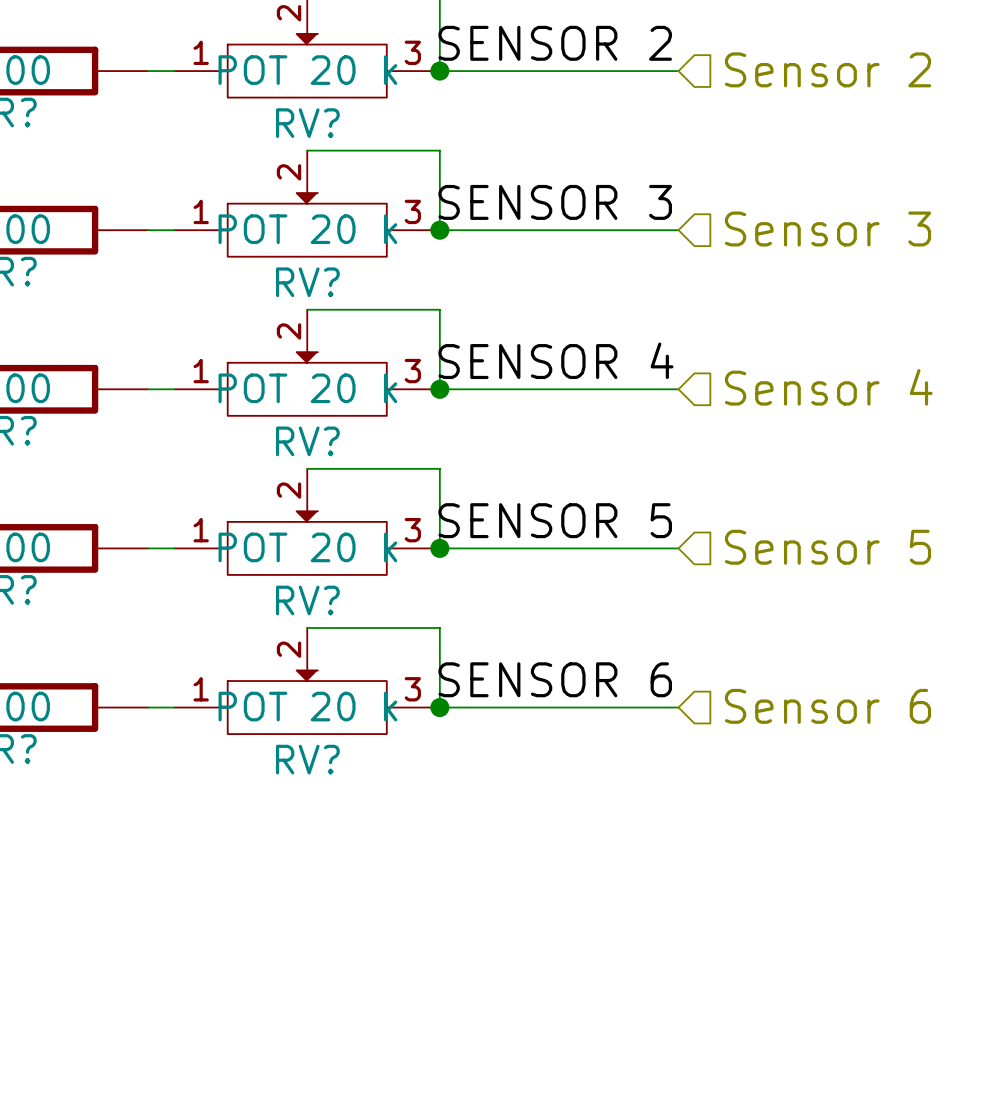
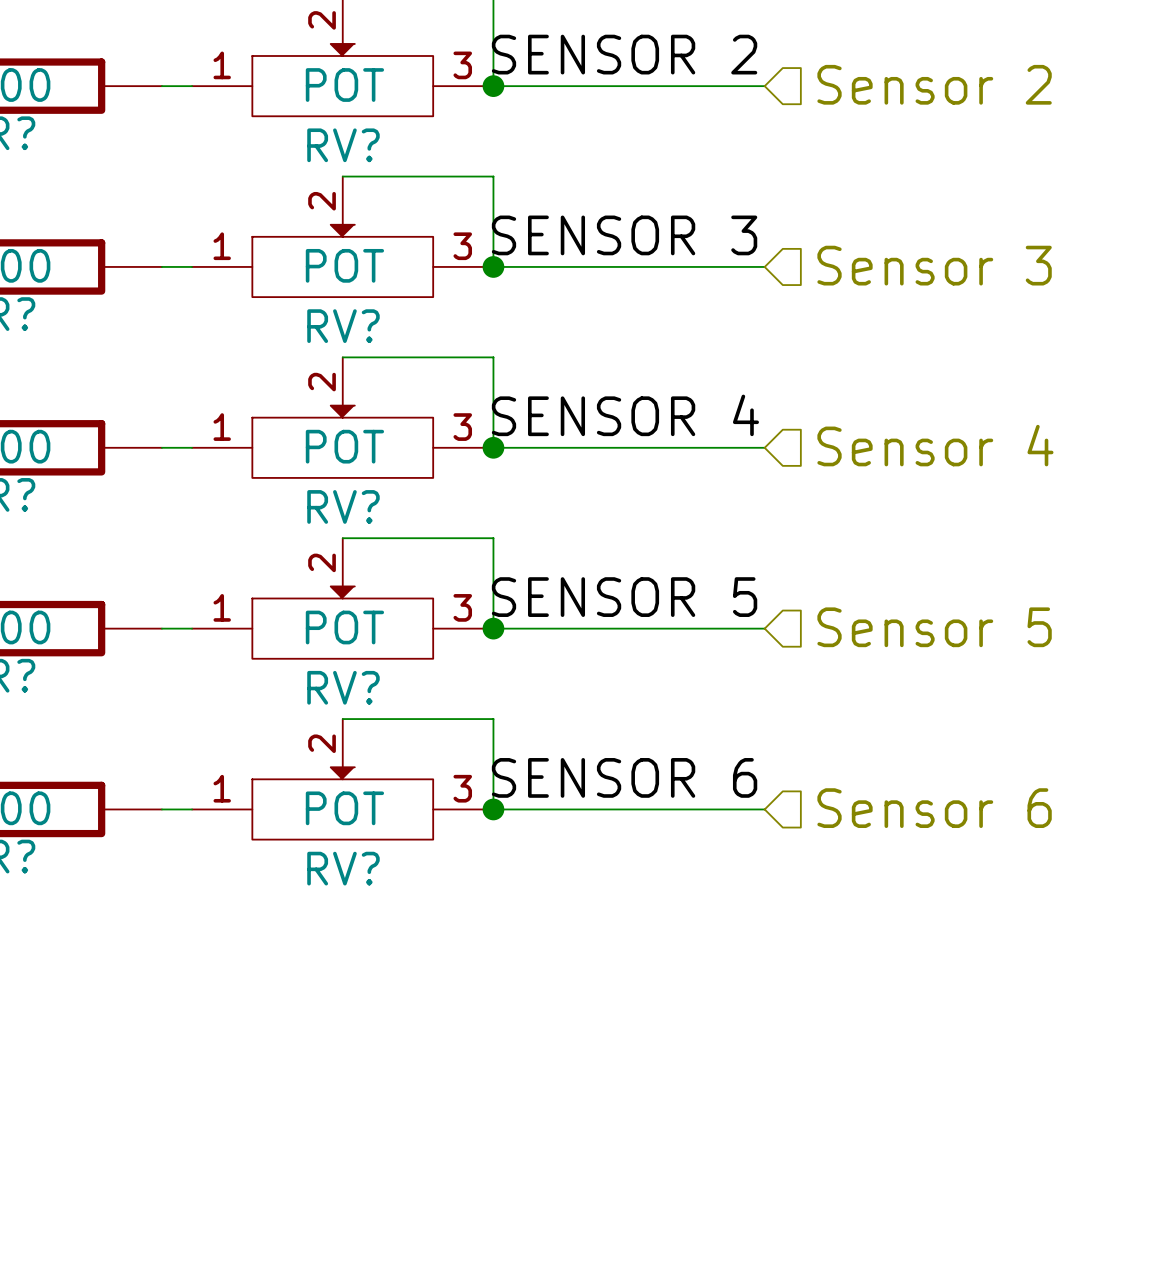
RV? value: POT 20 k (307, 70) -> POT (344, 85)
RV? value: POT 20 k (307, 229) -> POT (344, 265)
RV? value: POT 20 k (307, 388) -> POT (344, 446)
RV? value: POT 20 k (307, 547) -> POT (344, 627)
RV? value: POT 20 k (307, 706) -> POT (344, 808)

